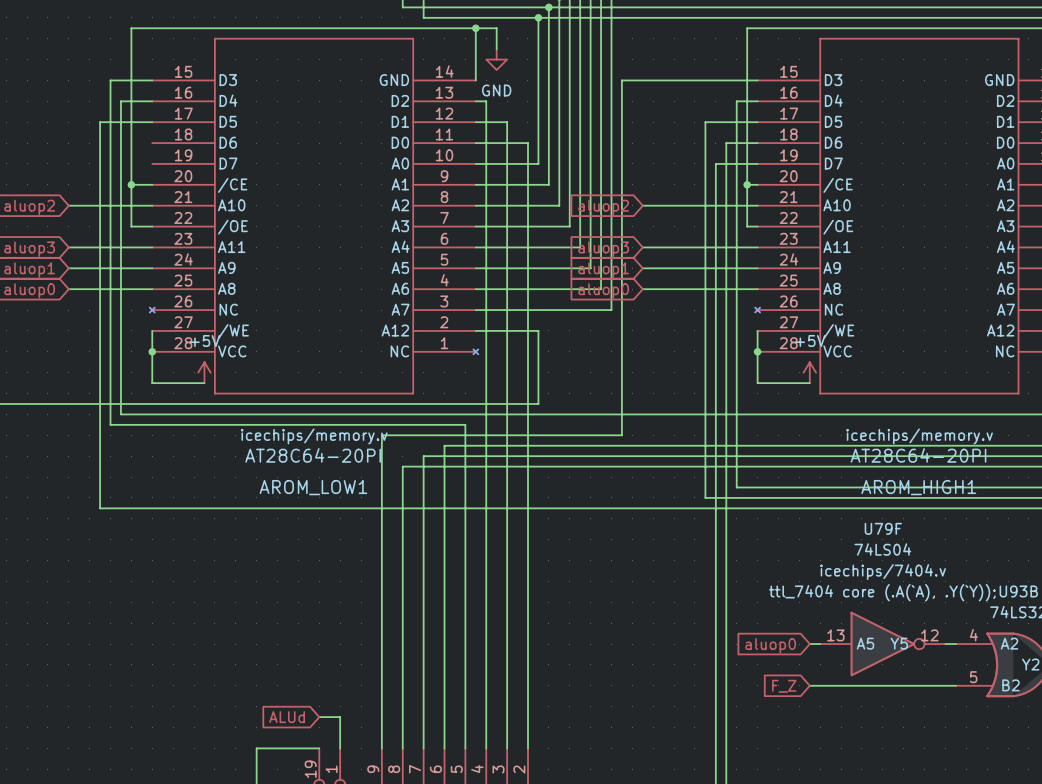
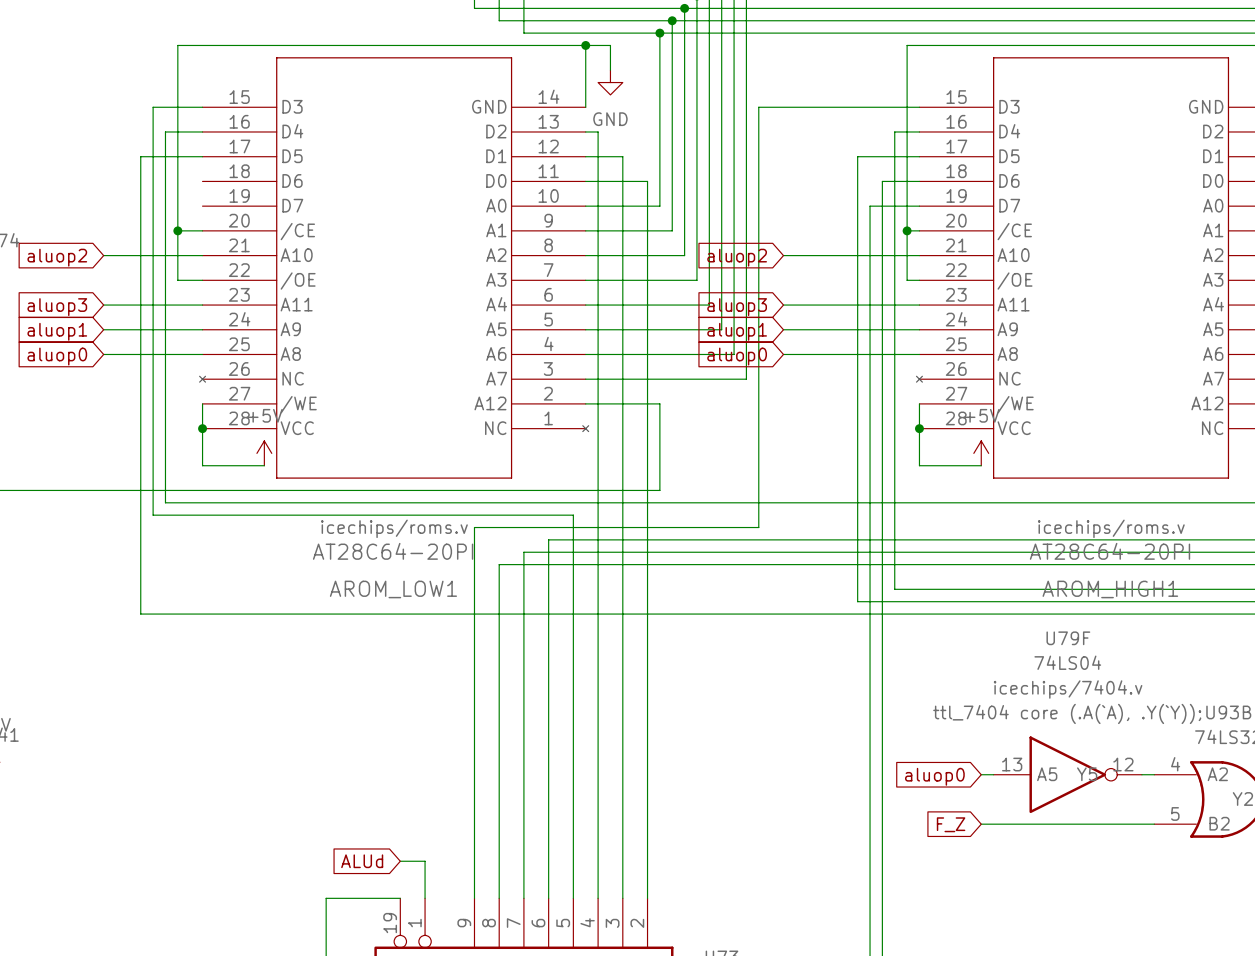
AROM_LOW1 text: icechips/memory.v (314, 436) -> icechips/roms.v (394, 528)
AROM_HIGH1 text: icechips/memory.v (919, 436) -> icechips/roms.v (1111, 528)

